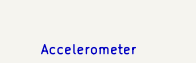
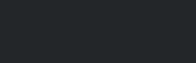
text: Accelerometer (88, 49) -> none

